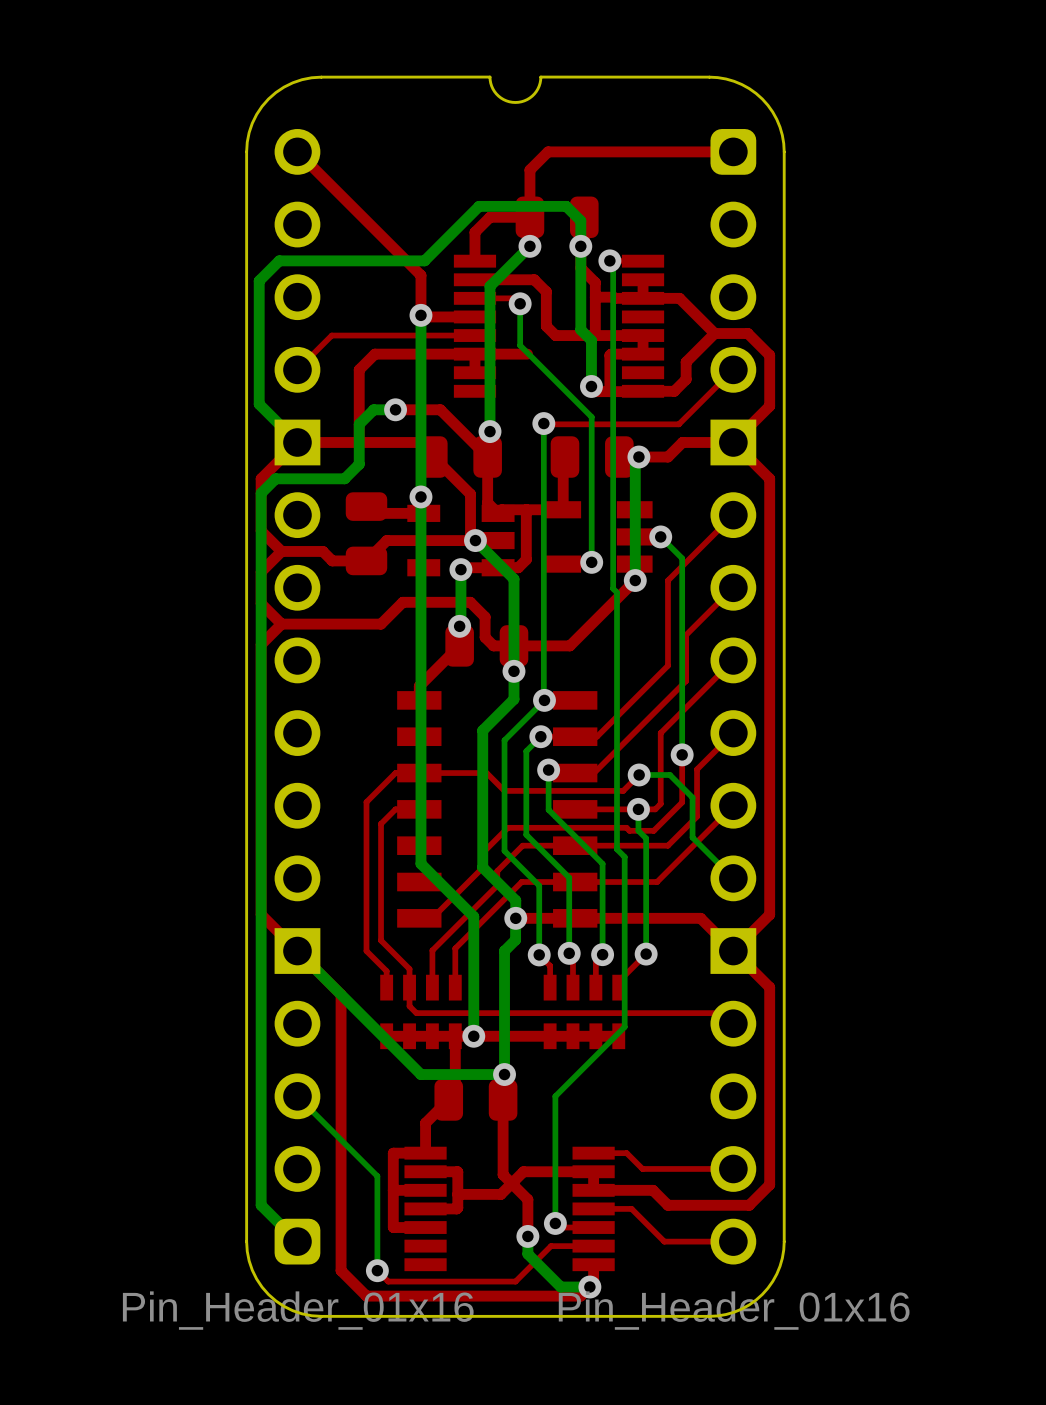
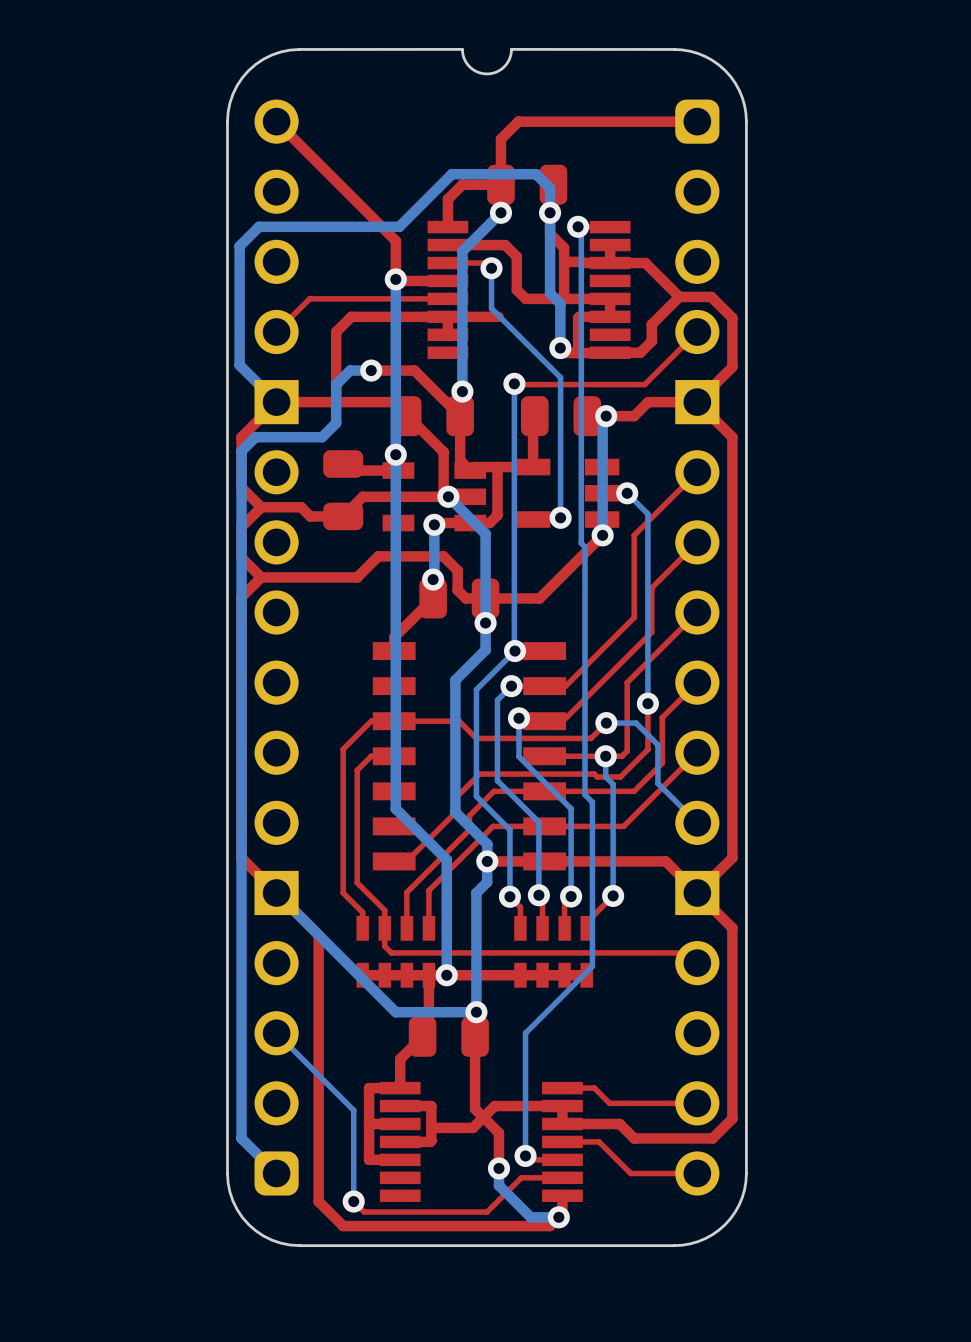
drawing: [122, 1291, 910, 1330] -> none

